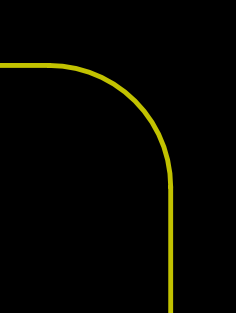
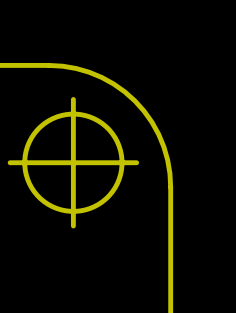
board edge: none -> (73, 99) (73, 225)
round board edge: none -> [22, 111, 125, 214]
board edge: none -> (10, 162) (136, 162)

